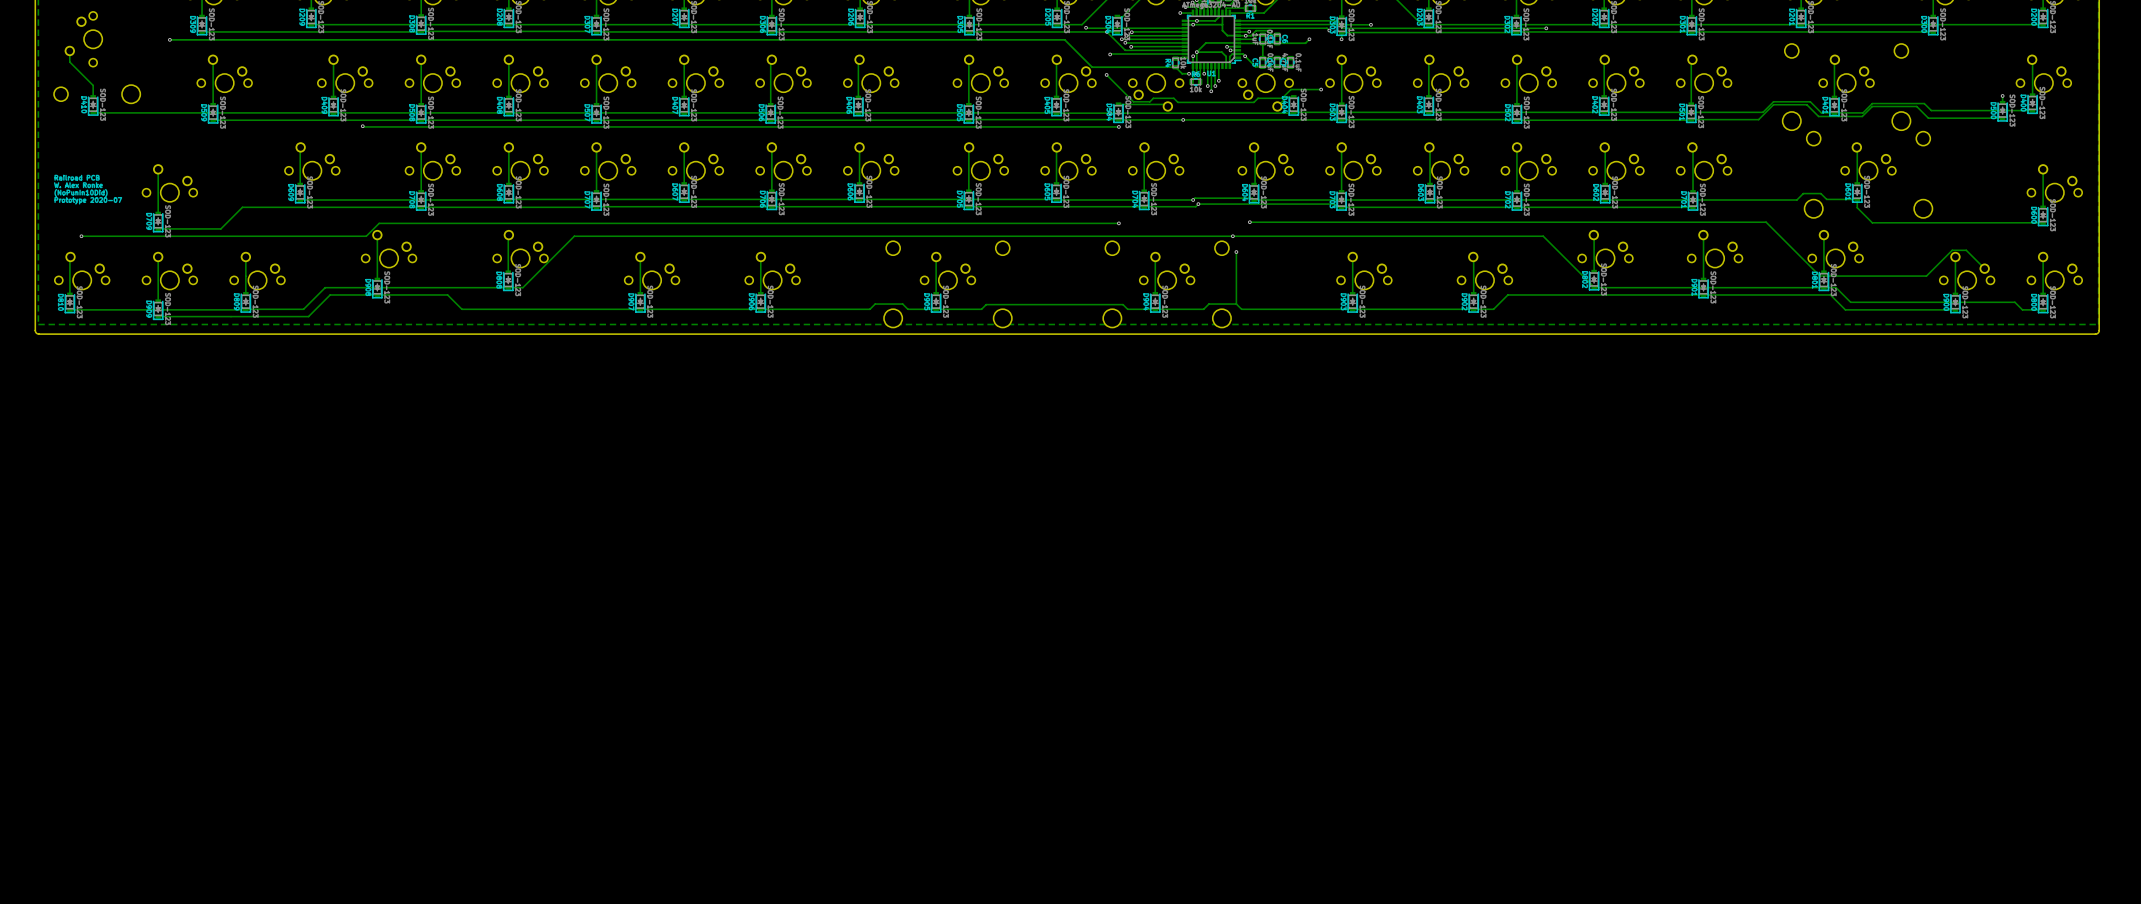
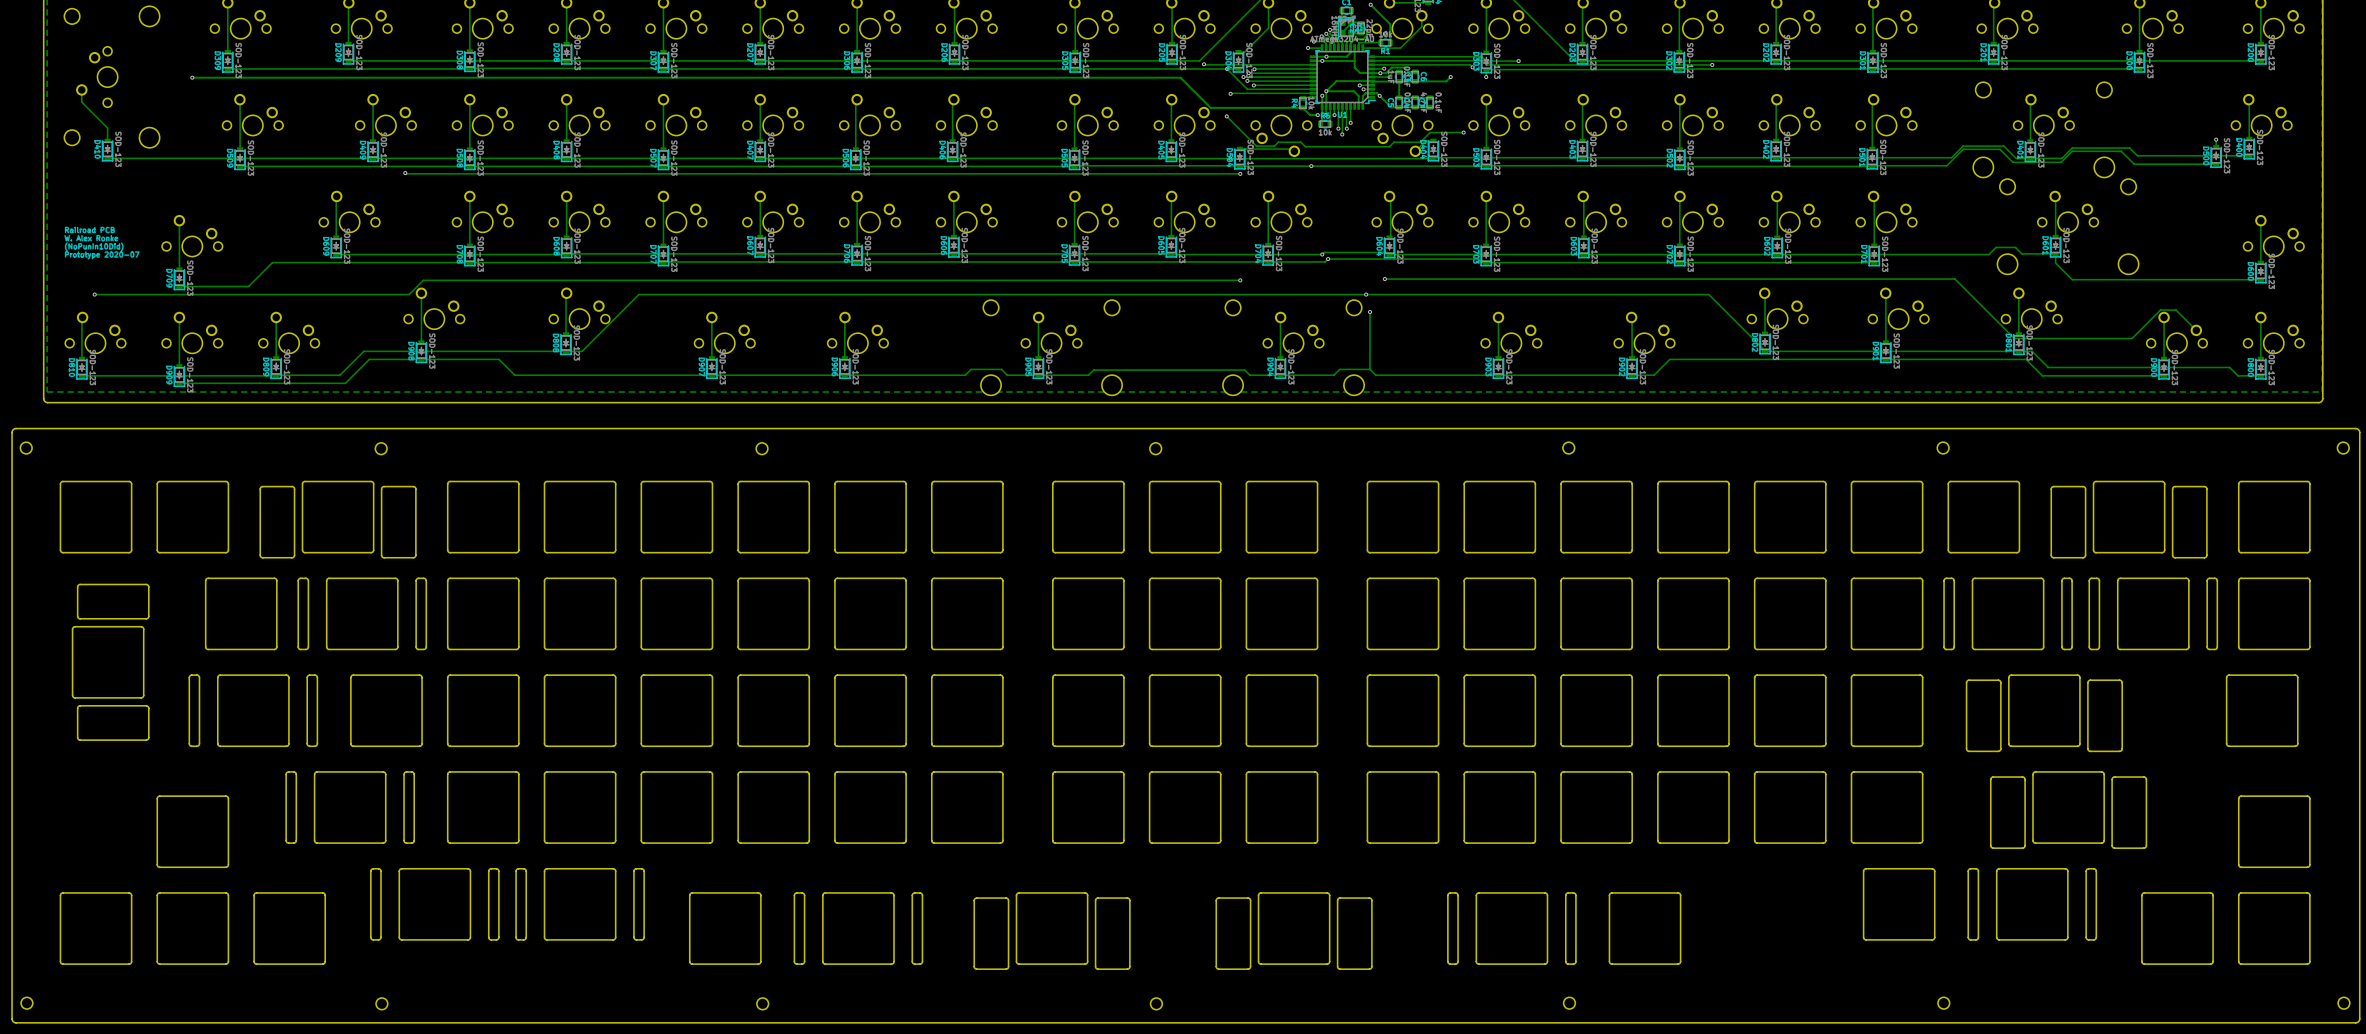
board edge: none -> (2355, 428) (15, 428) (12, 432) (12, 1019) (16, 1022) (2356, 1022) (2359, 1018) (2359, 432) (2355, 428)
round board edge: none -> [20, 441, 33, 455]
round board edge: none -> [1562, 441, 1576, 455]
round board edge: none -> [1936, 441, 1950, 455]
round board edge: none -> [2337, 441, 2350, 455]
round board edge: none -> [374, 442, 388, 455]
round board edge: none -> [755, 442, 769, 455]
round board edge: none -> [1149, 442, 1162, 455]
board edge: none -> (129, 481) (61, 482) (61, 551) (130, 551) (131, 484) (129, 481)
board edge: none -> (225, 481) (158, 482) (158, 551) (227, 551) (228, 484) (225, 481)
board edge: none -> (371, 481) (303, 482) (303, 551) (372, 551) (373, 484) (371, 481)
board edge: none -> (516, 481) (448, 482) (448, 551) (518, 551) (518, 484) (516, 481)
board edge: none -> (613, 481) (545, 482) (545, 551) (614, 551) (615, 484) (613, 481)
board edge: none -> (709, 481) (642, 482) (642, 551) (711, 551) (712, 484) (709, 481)
board edge: none -> (806, 481) (738, 482) (738, 551) (808, 551) (809, 484) (806, 481)
board edge: none -> (903, 481) (835, 482) (835, 551) (905, 551) (906, 484) (903, 481)
board edge: none -> (1000, 481) (932, 482) (932, 551) (1002, 551) (1002, 484) (1000, 481)
board edge: none -> (1121, 481) (1053, 482) (1053, 551) (1123, 551) (1123, 484) (1121, 481)
board edge: none -> (1218, 481) (1150, 482) (1150, 551) (1220, 551) (1220, 484) (1218, 481)
board edge: none -> (1315, 481) (1247, 482) (1247, 551) (1316, 551) (1317, 484) (1315, 481)
board edge: none -> (1436, 481) (1368, 482) (1368, 551) (1437, 551) (1438, 484) (1436, 481)
board edge: none -> (1532, 481) (1464, 482) (1464, 551) (1534, 551) (1535, 484) (1532, 481)
board edge: none -> (1629, 481) (1561, 482) (1561, 551) (1631, 551) (1632, 484) (1629, 481)
board edge: none -> (1726, 481) (1658, 482) (1658, 551) (1728, 551) (1729, 484) (1726, 481)
board edge: none -> (1823, 481) (1755, 482) (1755, 551) (1825, 551) (1825, 484) (1823, 481)
board edge: none -> (1920, 481) (1852, 482) (1852, 551) (1921, 551) (1922, 484) (1920, 481)
board edge: none -> (2016, 481) (1949, 482) (1949, 551) (2018, 551) (2019, 484) (2016, 481)
board edge: none -> (2162, 481) (2094, 482) (2094, 551) (2163, 551) (2164, 484) (2162, 481)
board edge: none -> (2307, 481) (2239, 482) (2239, 551) (2309, 551) (2309, 484) (2307, 481)
board edge: none -> (292, 486) (260, 488) (260, 555) (261, 557) (294, 556) (294, 489) (292, 486)
board edge: none -> (413, 486) (381, 488) (381, 555) (383, 557) (415, 556) (415, 489) (413, 486)
board edge: none -> (2083, 486) (2051, 488) (2051, 555) (2052, 557) (2085, 556) (2085, 489) (2083, 486)
board edge: none -> (2204, 486) (2172, 488) (2172, 555) (2174, 557) (2206, 556) (2206, 489) (2204, 486)
board edge: none -> (274, 578) (206, 579) (206, 648) (276, 648) (276, 580) (274, 578)
board edge: none -> (305, 578) (300, 578) (298, 580) (298, 646) (300, 649) (306, 649) (308, 647) (308, 580) (305, 578)
board edge: none -> (395, 578) (327, 579) (327, 648) (397, 648) (397, 580) (395, 578)
board edge: none -> (423, 578) (418, 578) (416, 580) (416, 646) (418, 649) (424, 649) (426, 647) (426, 580) (423, 578)
board edge: none -> (516, 578) (448, 579) (448, 648) (518, 648) (518, 580) (516, 578)
board edge: none -> (613, 578) (545, 579) (545, 648) (614, 648) (615, 580) (613, 578)
board edge: none -> (709, 578) (642, 579) (642, 648) (711, 648) (712, 580) (709, 578)
board edge: none -> (806, 578) (738, 579) (738, 648) (808, 648) (809, 580) (806, 578)
board edge: none -> (903, 578) (835, 579) (835, 648) (905, 648) (906, 580) (903, 578)
board edge: none -> (1000, 578) (932, 579) (932, 648) (1002, 648) (1002, 580) (1000, 578)
board edge: none -> (1121, 578) (1053, 579) (1053, 648) (1123, 648) (1123, 580) (1121, 578)
board edge: none -> (1218, 578) (1150, 579) (1150, 648) (1220, 648) (1220, 580) (1218, 578)
board edge: none -> (1315, 578) (1247, 579) (1247, 648) (1316, 648) (1317, 580) (1315, 578)
board edge: none -> (1436, 578) (1368, 579) (1368, 648) (1437, 648) (1438, 580) (1436, 578)
board edge: none -> (1532, 578) (1464, 579) (1464, 648) (1534, 648) (1535, 580) (1532, 578)
board edge: none -> (1629, 578) (1561, 579) (1561, 648) (1631, 648) (1632, 580) (1629, 578)
board edge: none -> (1726, 578) (1658, 579) (1658, 648) (1728, 648) (1729, 580) (1726, 578)
board edge: none -> (1823, 578) (1755, 579) (1755, 648) (1825, 648) (1825, 580) (1823, 578)
board edge: none -> (1920, 578) (1852, 579) (1852, 648) (1921, 648) (1922, 580) (1920, 578)
board edge: none -> (1951, 578) (1945, 578) (1944, 580) (1944, 646) (1946, 649) (1952, 649) (1954, 647) (1954, 580) (1951, 578)
board edge: none -> (2041, 578) (1973, 579) (1973, 648) (2042, 648) (2043, 580) (2041, 578)
board edge: none -> (2069, 578) (2063, 578) (2061, 580) (2061, 646) (2064, 649) (2070, 649) (2072, 647) (2072, 580) (2069, 578)
board edge: none -> (2096, 578) (2091, 578) (2089, 580) (2089, 646) (2091, 649) (2097, 649) (2099, 647) (2099, 580) (2096, 578)
board edge: none -> (2186, 578) (2118, 579) (2118, 648) (2188, 648) (2188, 580) (2186, 578)
board edge: none -> (2214, 578) (2209, 578) (2207, 580) (2207, 646) (2209, 649) (2215, 649) (2217, 647) (2217, 580) (2214, 578)
board edge: none -> (2307, 578) (2239, 579) (2239, 648) (2309, 648) (2309, 580) (2307, 578)
board edge: none -> (146, 584) (79, 584) (77, 617) (80, 618) (147, 618) (148, 587) (146, 584)
board edge: none -> (141, 626) (73, 627) (73, 697) (142, 697) (143, 629) (141, 626)
board edge: none -> (196, 675) (191, 675) (189, 677) (189, 743) (191, 746) (197, 746) (199, 744) (199, 677) (196, 675)
board edge: none -> (286, 675) (218, 675) (218, 745) (288, 745) (288, 677) (286, 675)
board edge: none -> (314, 675) (309, 675) (307, 677) (307, 743) (309, 746) (315, 746) (317, 744) (317, 677) (314, 675)
board edge: none -> (419, 675) (351, 675) (351, 745) (421, 745) (422, 677) (419, 675)
board edge: none -> (516, 675) (448, 675) (448, 745) (518, 745) (518, 677) (516, 675)
board edge: none -> (613, 675) (545, 675) (545, 745) (614, 745) (615, 677) (613, 675)
board edge: none -> (709, 675) (642, 675) (642, 745) (711, 745) (712, 677) (709, 675)
board edge: none -> (806, 675) (738, 675) (738, 745) (808, 745) (809, 677) (806, 675)
board edge: none -> (903, 675) (835, 675) (835, 745) (905, 745) (906, 677) (903, 675)
board edge: none -> (1000, 675) (932, 675) (932, 745) (1002, 745) (1002, 677) (1000, 675)
board edge: none -> (1121, 675) (1053, 675) (1053, 745) (1123, 745) (1123, 677) (1121, 675)
board edge: none -> (1218, 675) (1150, 675) (1150, 745) (1220, 745) (1220, 677) (1218, 675)
board edge: none -> (1315, 675) (1247, 675) (1247, 745) (1316, 745) (1317, 677) (1315, 675)
board edge: none -> (1436, 675) (1368, 675) (1368, 745) (1437, 745) (1438, 677) (1436, 675)
board edge: none -> (1532, 675) (1464, 675) (1464, 745) (1534, 745) (1535, 677) (1532, 675)
board edge: none -> (1629, 675) (1561, 675) (1561, 745) (1631, 745) (1632, 677) (1629, 675)
board edge: none -> (1726, 675) (1658, 675) (1658, 745) (1728, 745) (1729, 677) (1726, 675)
board edge: none -> (1823, 675) (1755, 675) (1755, 745) (1825, 745) (1825, 677) (1823, 675)
board edge: none -> (1920, 675) (1852, 675) (1852, 745) (1921, 745) (1922, 677) (1920, 675)
board edge: none -> (2077, 675) (2009, 675) (2009, 745) (2079, 745) (2079, 677) (2077, 675)
board edge: none -> (2295, 675) (2227, 675) (2227, 745) (2297, 745) (2297, 677) (2295, 675)
board edge: none -> (1998, 680) (1966, 681) (1966, 748) (1968, 751) (2000, 749) (2000, 682) (1998, 680)
board edge: none -> (2119, 680) (2088, 681) (2087, 748) (2089, 751) (2122, 749) (2122, 682) (2119, 680)
board edge: none -> (146, 705) (79, 706) (77, 738) (80, 740) (147, 739) (148, 708) (146, 705)
board edge: none -> (293, 771) (288, 772) (286, 774) (286, 840) (288, 843) (294, 843) (296, 840) (296, 774) (293, 771)
board edge: none -> (383, 771) (315, 772) (315, 842) (384, 842) (385, 774) (383, 771)
board edge: none -> (411, 771) (405, 772) (404, 774) (404, 840) (406, 843) (412, 843) (414, 840) (414, 774) (411, 771)
board edge: none -> (516, 771) (448, 772) (448, 842) (518, 842) (518, 774) (516, 771)
board edge: none -> (613, 771) (545, 772) (545, 842) (614, 842) (615, 774) (613, 771)
board edge: none -> (709, 771) (642, 772) (642, 842) (711, 842) (712, 774) (709, 771)
board edge: none -> (806, 771) (738, 772) (738, 842) (808, 842) (809, 774) (806, 771)
board edge: none -> (903, 771) (835, 772) (835, 842) (905, 842) (906, 774) (903, 771)
board edge: none -> (1000, 771) (932, 772) (932, 842) (1002, 842) (1002, 774) (1000, 771)
board edge: none -> (1121, 771) (1053, 772) (1053, 842) (1123, 842) (1123, 774) (1121, 771)
board edge: none -> (1218, 771) (1150, 772) (1150, 842) (1220, 842) (1220, 774) (1218, 771)
board edge: none -> (1315, 771) (1247, 772) (1247, 842) (1316, 842) (1317, 774) (1315, 771)
board edge: none -> (1436, 771) (1368, 772) (1368, 842) (1437, 842) (1438, 774) (1436, 771)
board edge: none -> (1532, 771) (1464, 772) (1464, 842) (1534, 842) (1535, 774) (1532, 771)
board edge: none -> (1629, 771) (1561, 772) (1561, 842) (1631, 842) (1632, 774) (1629, 771)
board edge: none -> (1726, 771) (1658, 772) (1658, 842) (1728, 842) (1729, 774) (1726, 771)
board edge: none -> (1823, 771) (1755, 772) (1755, 842) (1825, 842) (1825, 774) (1823, 771)
board edge: none -> (1920, 771) (1852, 772) (1852, 842) (1921, 842) (1922, 774) (1920, 771)
board edge: none -> (2101, 771) (2033, 772) (2033, 842) (2103, 842) (2104, 774) (2101, 771)
board edge: none -> (2022, 777) (1990, 778) (1990, 845) (1992, 847) (2024, 846) (2025, 779) (2022, 777)
board edge: none -> (2143, 777) (2112, 778) (2112, 845) (2113, 847) (2146, 846) (2146, 779) (2143, 777)
board edge: none -> (225, 796) (158, 796) (158, 866) (227, 866) (228, 798) (225, 796)
board edge: none -> (2307, 796) (2239, 796) (2239, 866) (2309, 866) (2309, 798) (2307, 796)
board edge: none -> (378, 868) (372, 868) (370, 870) (370, 937) (373, 939) (379, 939) (380, 937) (381, 871) (378, 868)
board edge: none -> (467, 868) (400, 869) (400, 939) (469, 939) (470, 871) (467, 868)
board edge: none -> (496, 868) (490, 868) (488, 870) (488, 937) (490, 939) (497, 939) (498, 937) (498, 871) (496, 868)
board edge: none -> (523, 868) (517, 868) (516, 870) (516, 937) (518, 939) (524, 939) (526, 937) (526, 871) (523, 868)
board edge: none -> (613, 868) (545, 869) (545, 939) (614, 939) (615, 871) (613, 868)
board edge: none -> (641, 868) (635, 868) (633, 870) (633, 937) (636, 939) (642, 939) (644, 937) (644, 871) (641, 868)
board edge: none -> (1932, 868) (1864, 869) (1864, 939) (1933, 939) (1934, 871) (1932, 868)
board edge: none -> (1975, 868) (1970, 868) (1968, 870) (1968, 937) (1970, 939) (1976, 939) (1978, 937) (1978, 871) (1975, 868)
board edge: none -> (2065, 868) (1997, 869) (1997, 939) (2067, 939) (2067, 871) (2065, 868)
board edge: none -> (2093, 868) (2088, 868) (2086, 870) (2086, 937) (2088, 939) (2094, 939) (2096, 937) (2096, 871) (2093, 868)
board edge: none -> (129, 892) (61, 893) (61, 963) (130, 963) (131, 895) (129, 892)
board edge: none -> (225, 892) (158, 893) (158, 963) (227, 963) (228, 895) (225, 892)
board edge: none -> (322, 892) (254, 893) (254, 963) (324, 963) (325, 895) (322, 892)
board edge: none -> (758, 892) (690, 893) (690, 963) (760, 963) (760, 895) (758, 892)
board edge: none -> (802, 892) (796, 893) (794, 895) (794, 961) (796, 964) (802, 964) (804, 961) (804, 895) (802, 892)
board edge: none -> (891, 892) (823, 893) (823, 963) (893, 963) (894, 895) (891, 892)
board edge: none -> (919, 892) (914, 893) (912, 895) (912, 961) (914, 964) (920, 964) (922, 961) (922, 895) (919, 892)
board edge: none -> (1085, 892) (1017, 893) (1017, 963) (1086, 963) (1087, 895) (1085, 892)
board edge: none -> (1327, 892) (1259, 893) (1259, 963) (1328, 963) (1329, 895) (1327, 892)
board edge: none -> (1455, 892) (1449, 893) (1447, 895) (1447, 961) (1450, 964) (1456, 964) (1458, 961) (1458, 895) (1455, 892)
board edge: none -> (1544, 892) (1477, 893) (1477, 963) (1546, 963) (1547, 895) (1544, 892)
board edge: none -> (1573, 892) (1567, 893) (1565, 895) (1565, 961) (1567, 964) (1574, 964) (1575, 961) (1575, 895) (1573, 892)
board edge: none -> (1678, 892) (1610, 893) (1610, 963) (1679, 963) (1680, 895) (1678, 892)
board edge: none -> (2210, 892) (2142, 893) (2142, 963) (2212, 963) (2213, 895) (2210, 892)
board edge: none -> (2307, 892) (2239, 893) (2239, 963) (2309, 963) (2309, 895) (2307, 892)
board edge: none -> (1005, 898) (974, 899) (974, 966) (975, 969) (1008, 967) (1008, 900) (1005, 898)
board edge: none -> (1127, 898) (1095, 899) (1095, 966) (1097, 969) (1129, 967) (1129, 900) (1127, 898)
board edge: none -> (1248, 898) (1216, 899) (1216, 966) (1217, 969) (1250, 967) (1250, 900) (1248, 898)
board edge: none -> (1369, 898) (1337, 899) (1337, 966) (1339, 969) (1371, 967) (1371, 900) (1369, 898)
round board edge: none -> [20, 996, 34, 1010]
round board edge: none -> [375, 997, 389, 1011]
round board edge: none -> [756, 997, 769, 1011]
round board edge: none -> [1150, 997, 1163, 1011]
round board edge: none -> [1563, 996, 1576, 1010]
round board edge: none -> [1937, 996, 1951, 1010]
round board edge: none -> [2337, 996, 2351, 1010]

